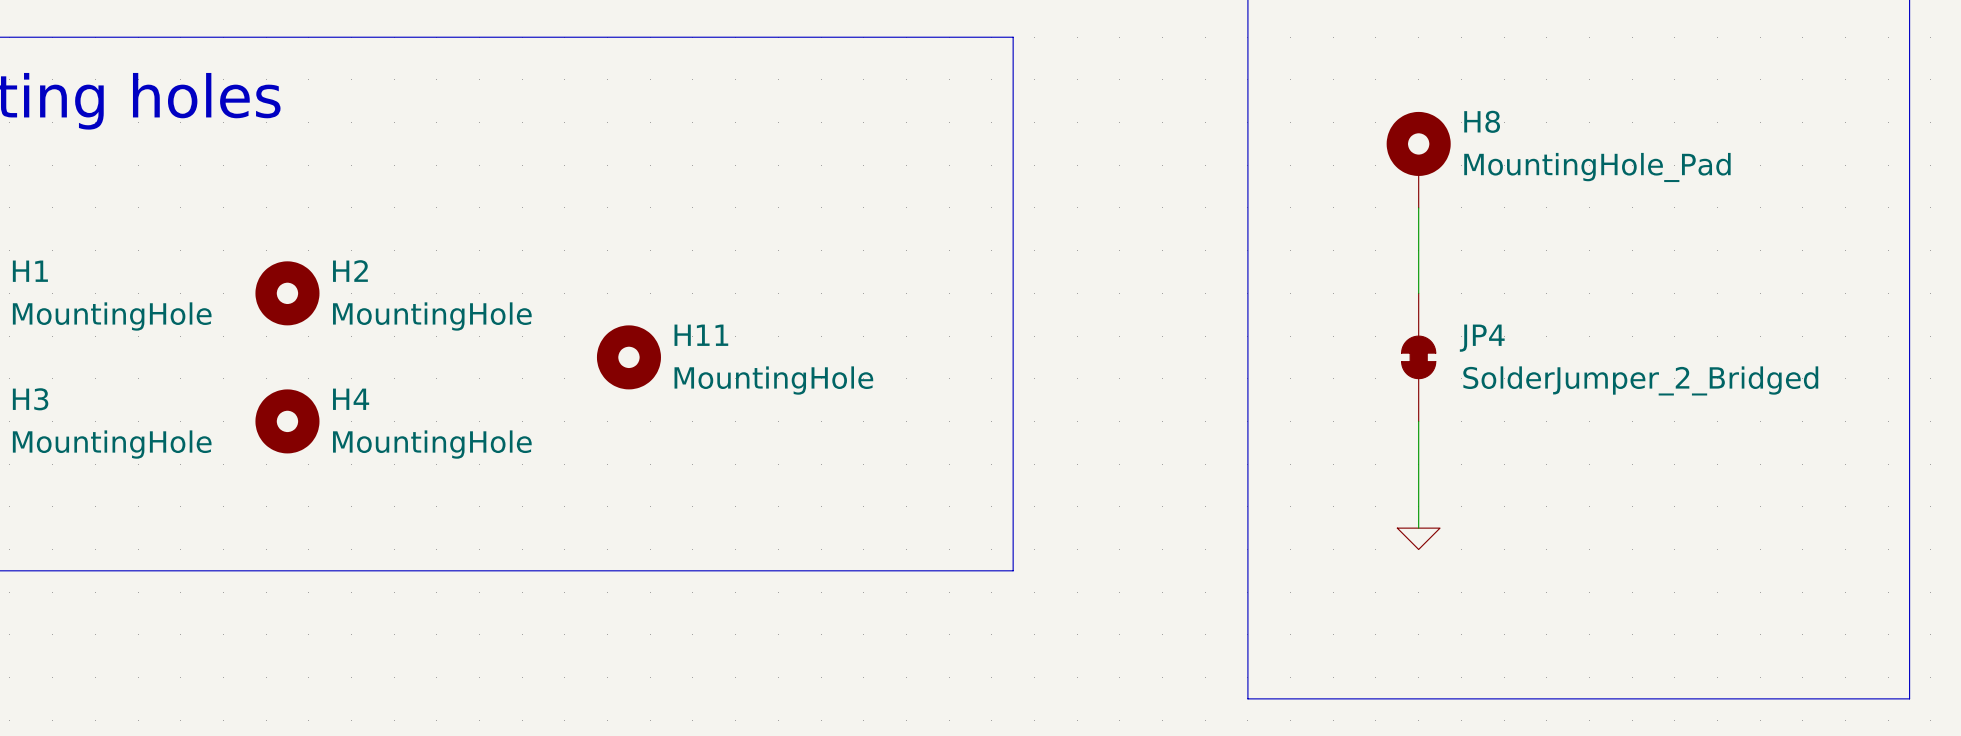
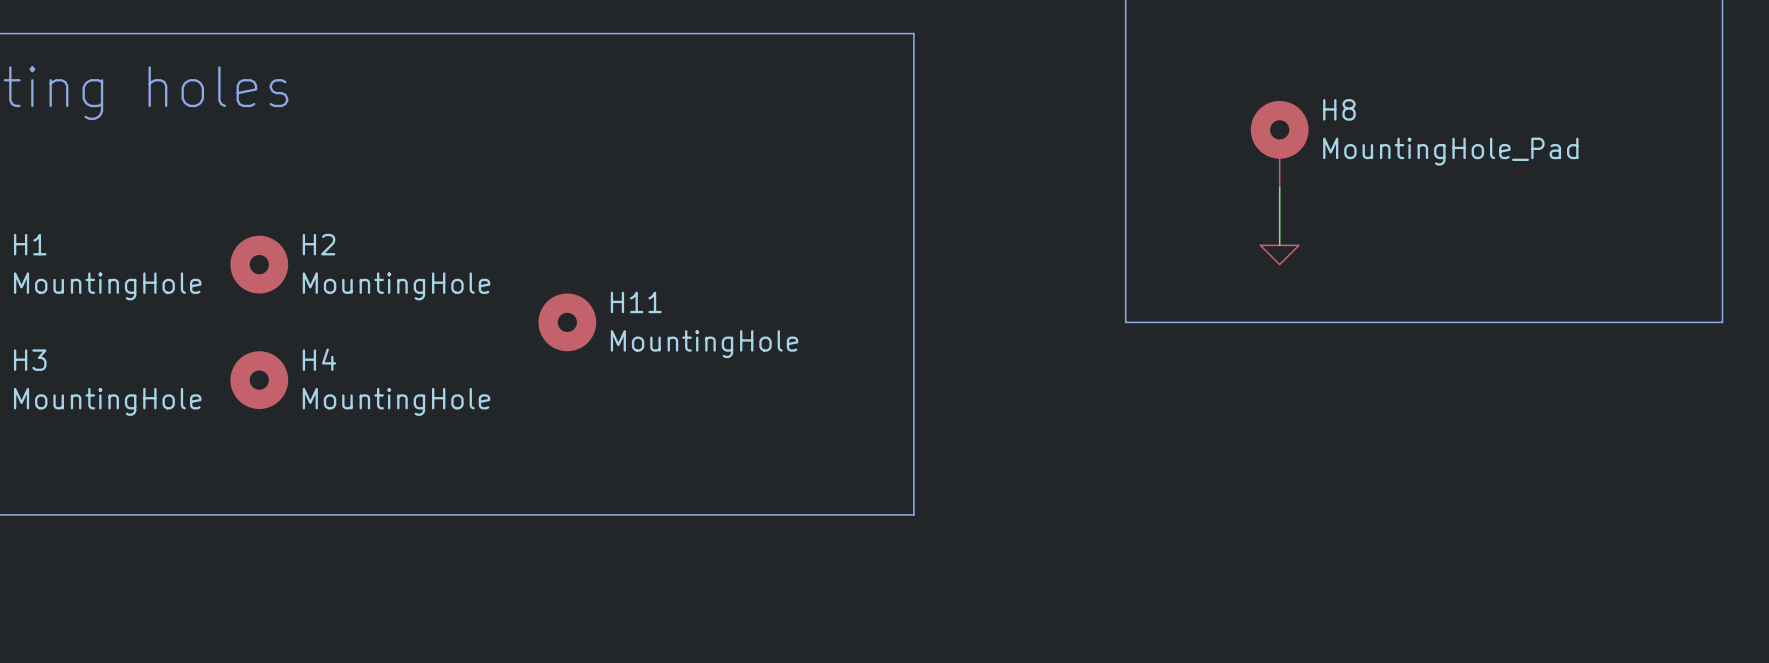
wire: (1418, 272) (1418, 293) -> none
line: (1247, 357) (1247, 698) (1909, 698) (1909, 357) -> (1125, 322) (1722, 322)
JP4: SolderJumper_2_Bridged (1418, 357) -> none
wire: (1418, 421) (1418, 528) -> none
power symbol position: (1418, 538) -> (1279, 254)

